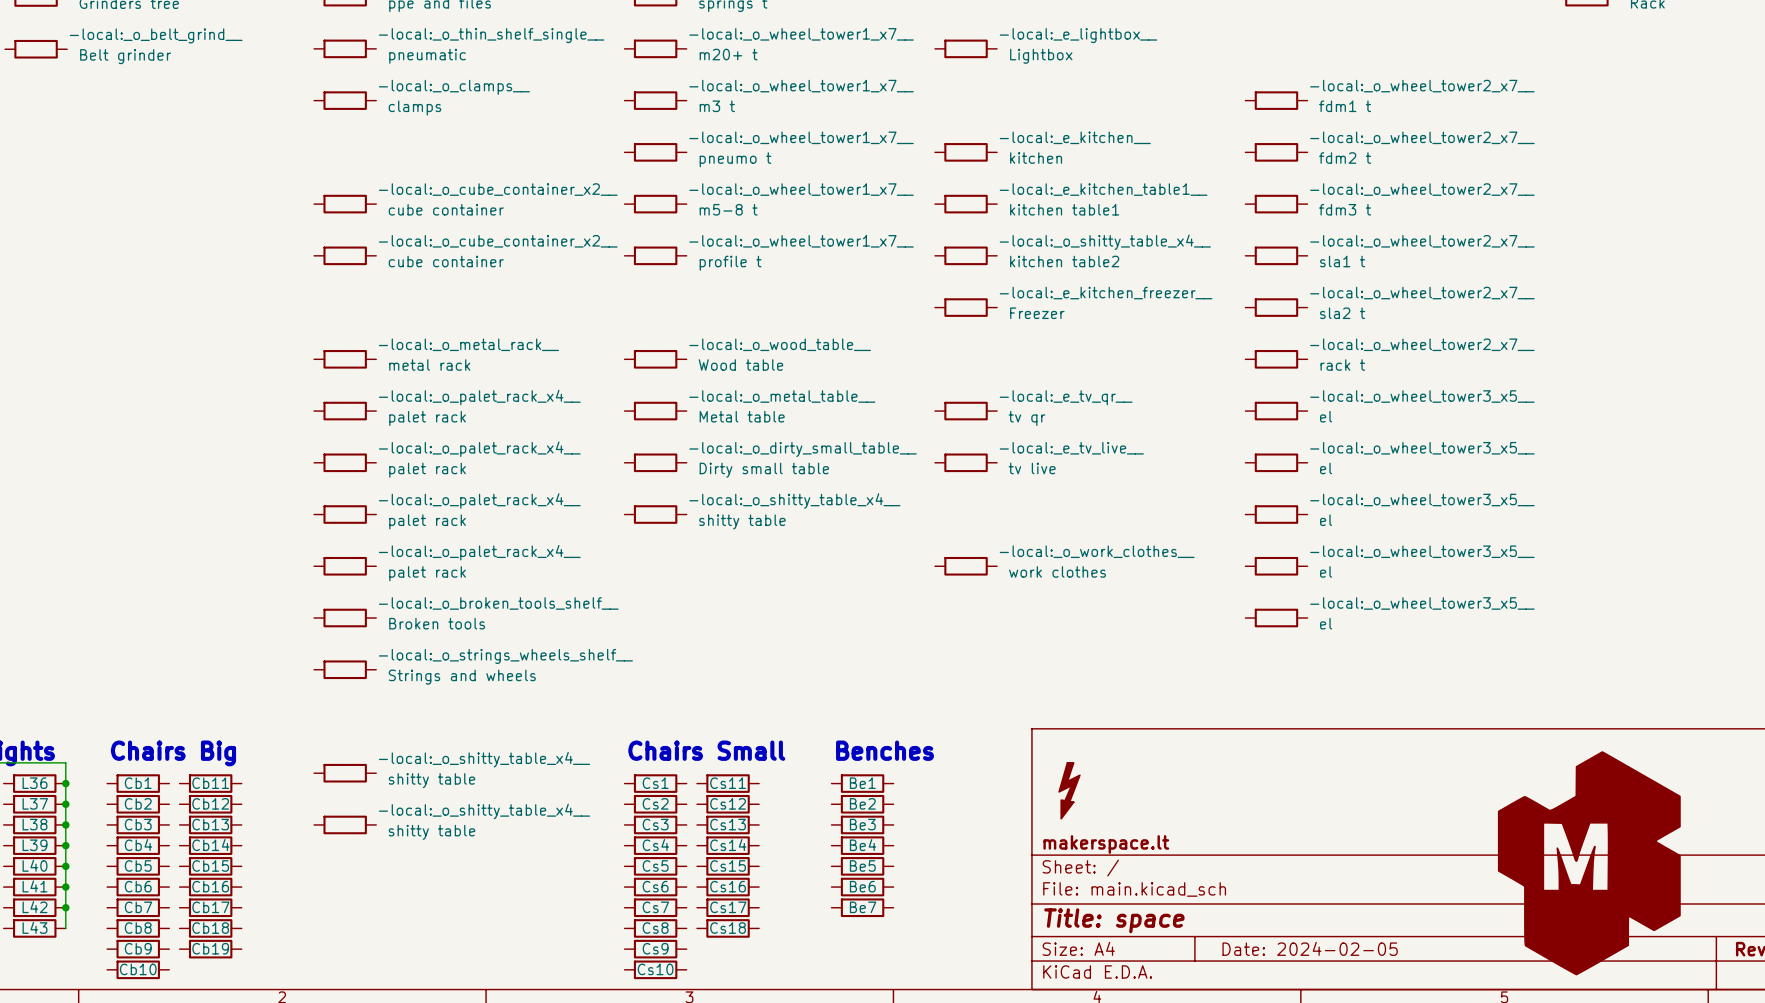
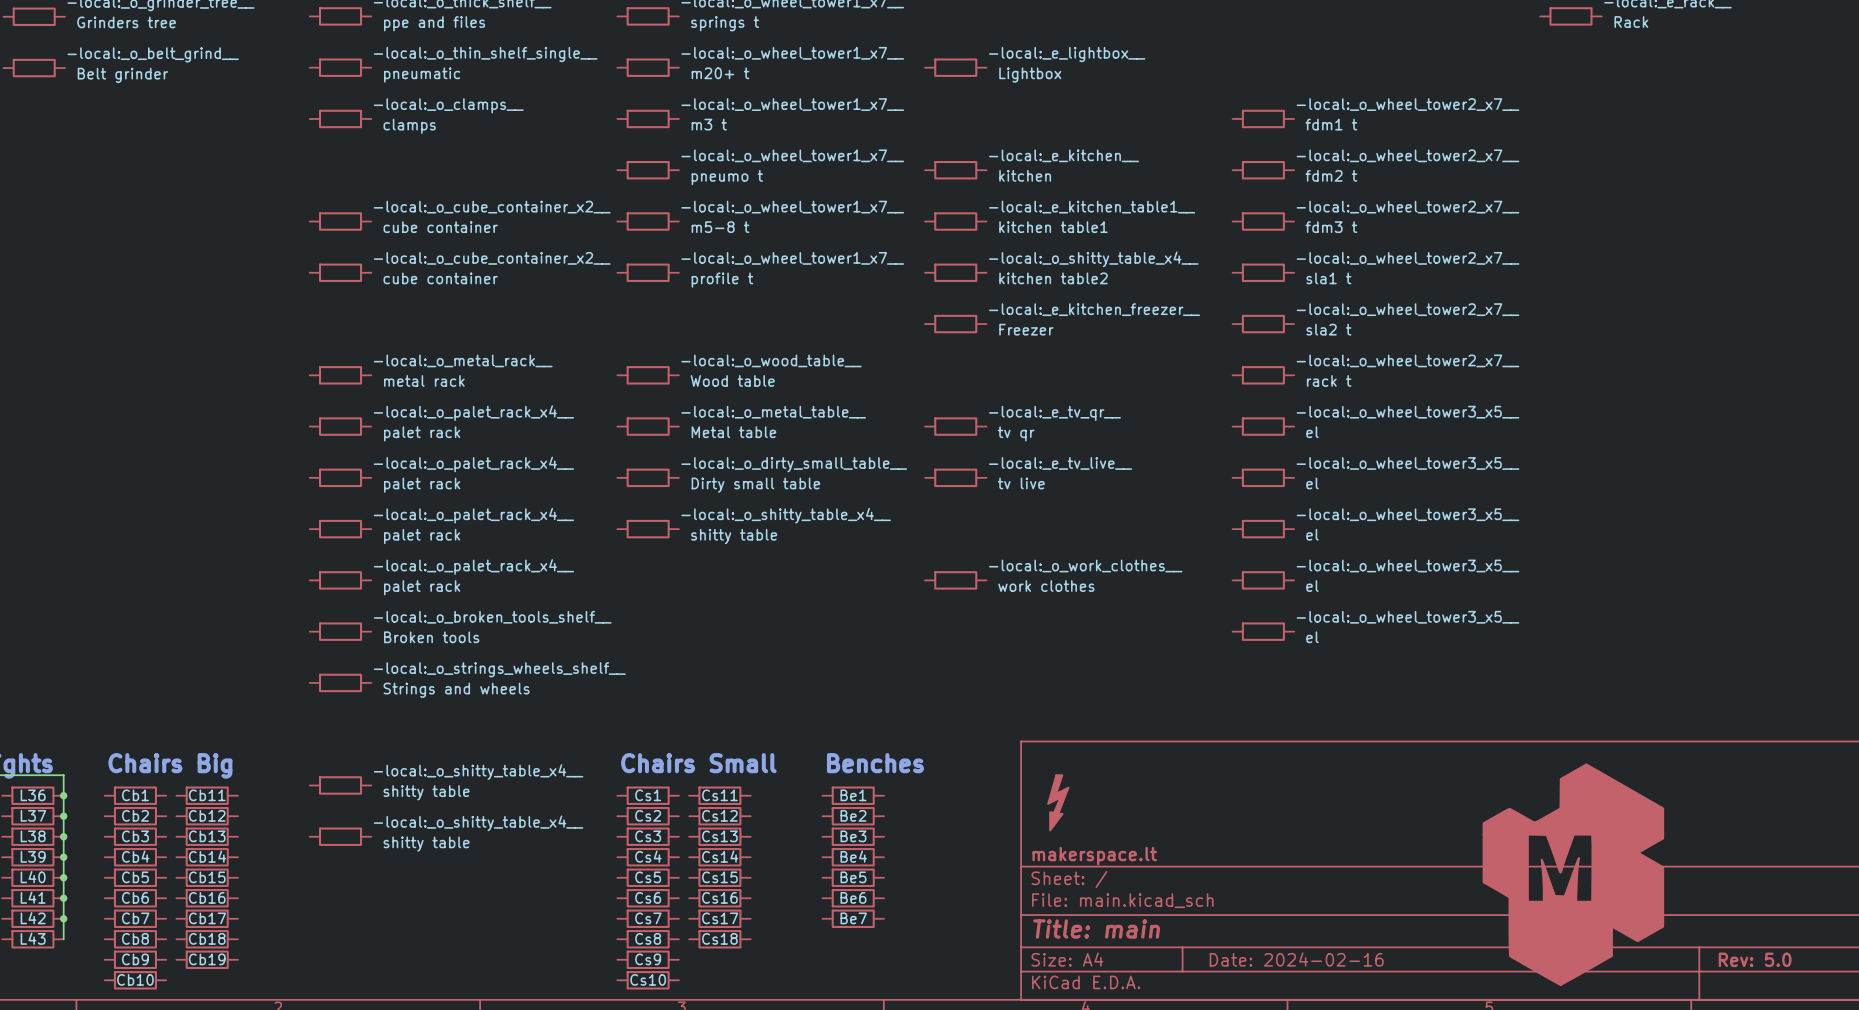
title block: Title: space (1114, 920) -> Title: main (1096, 928)
title block: Date: 2024-02-05 (1310, 948) -> Date: 2024-02-16 (1296, 959)

